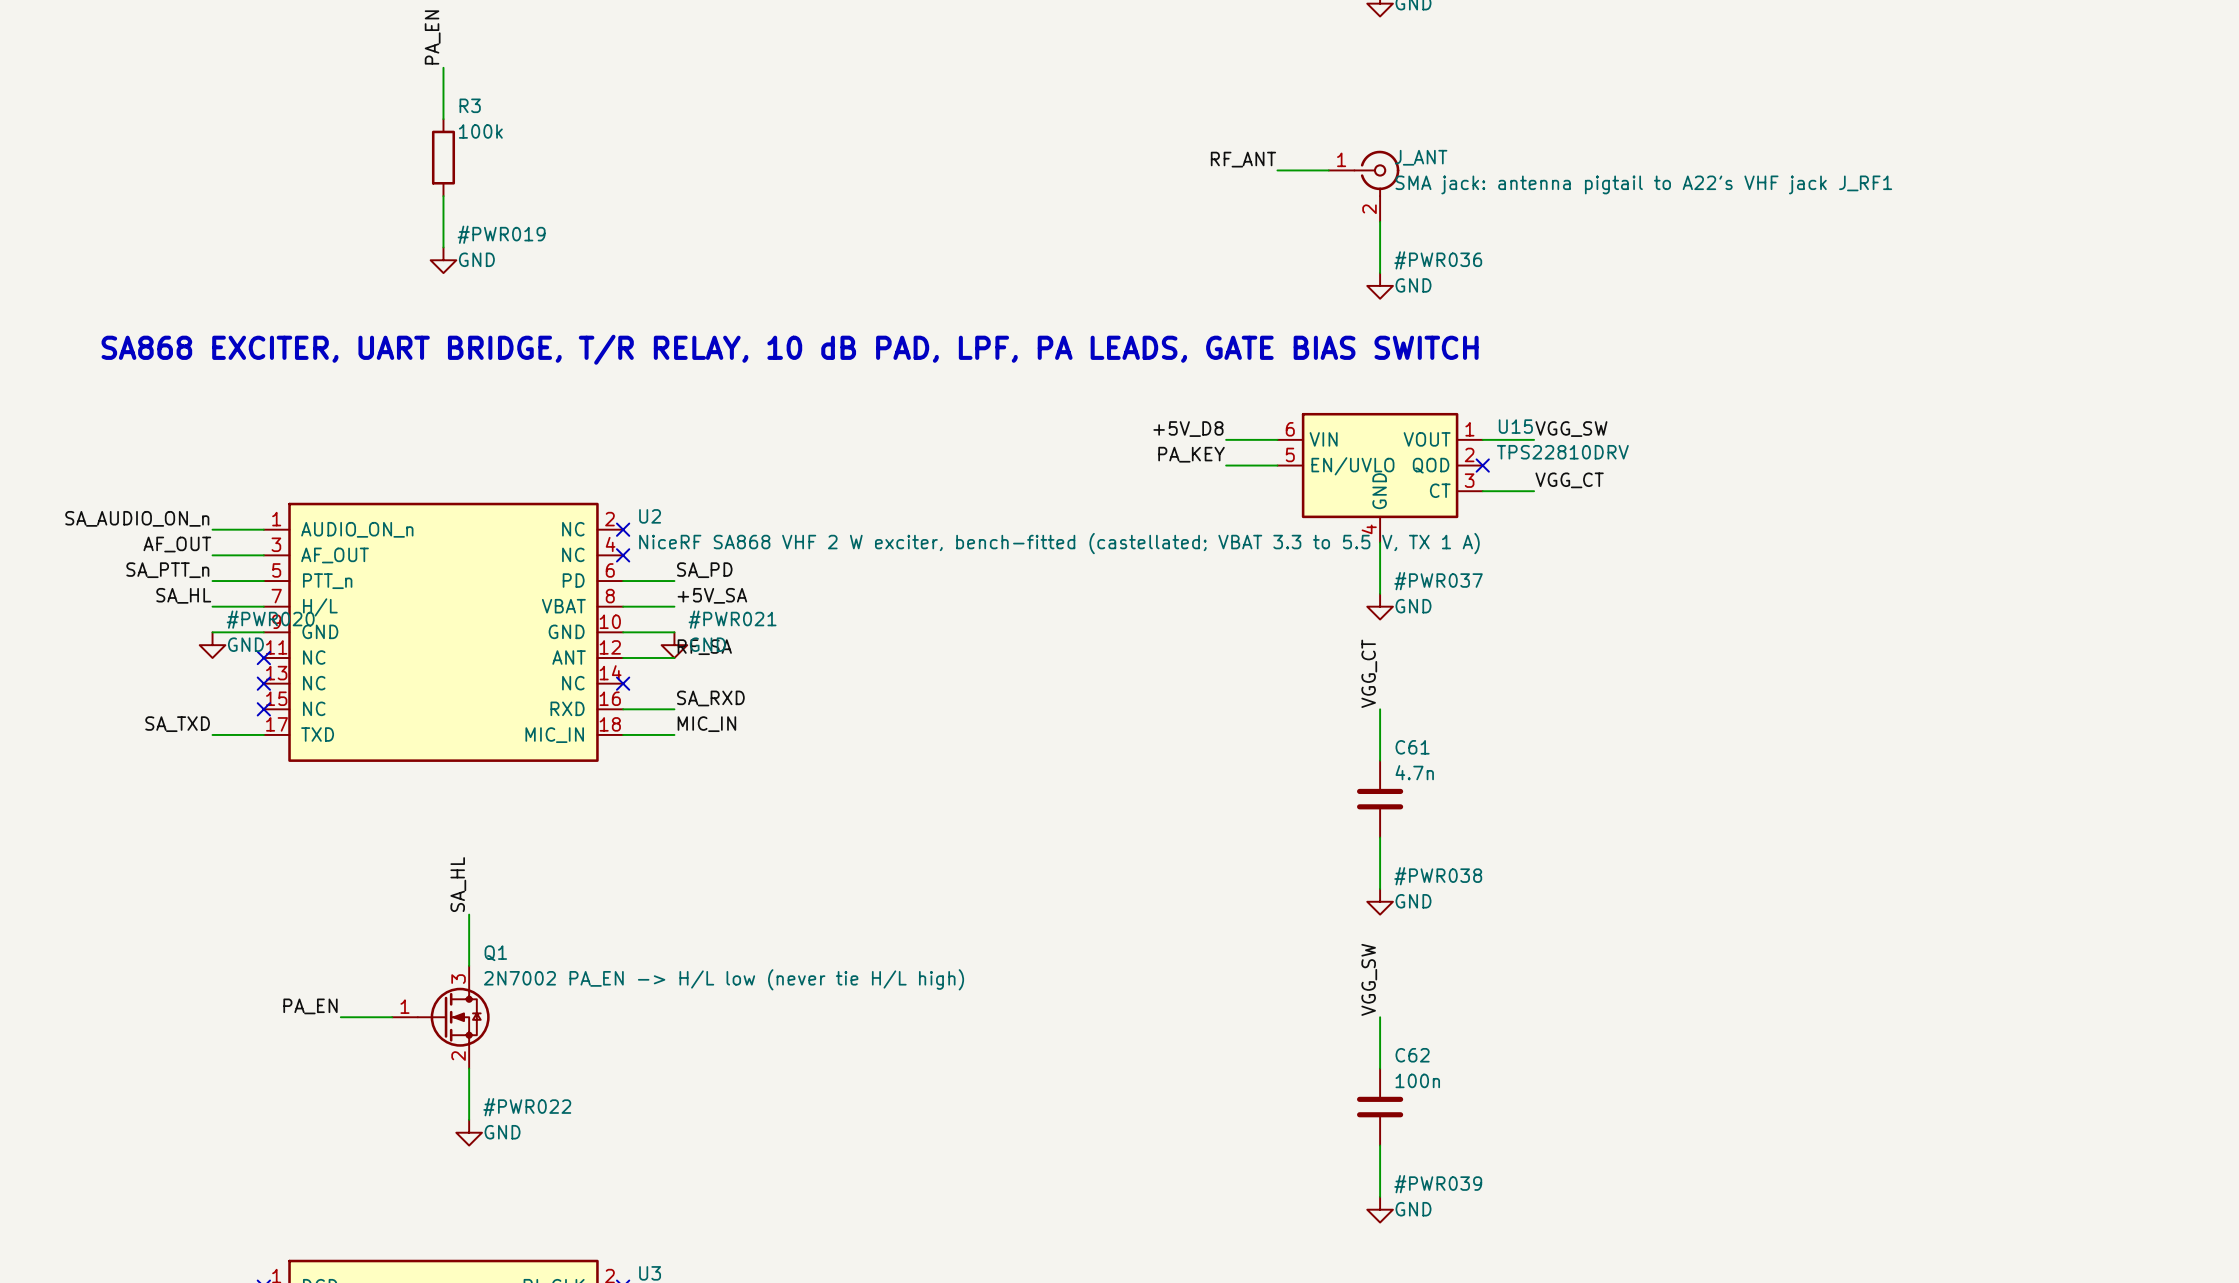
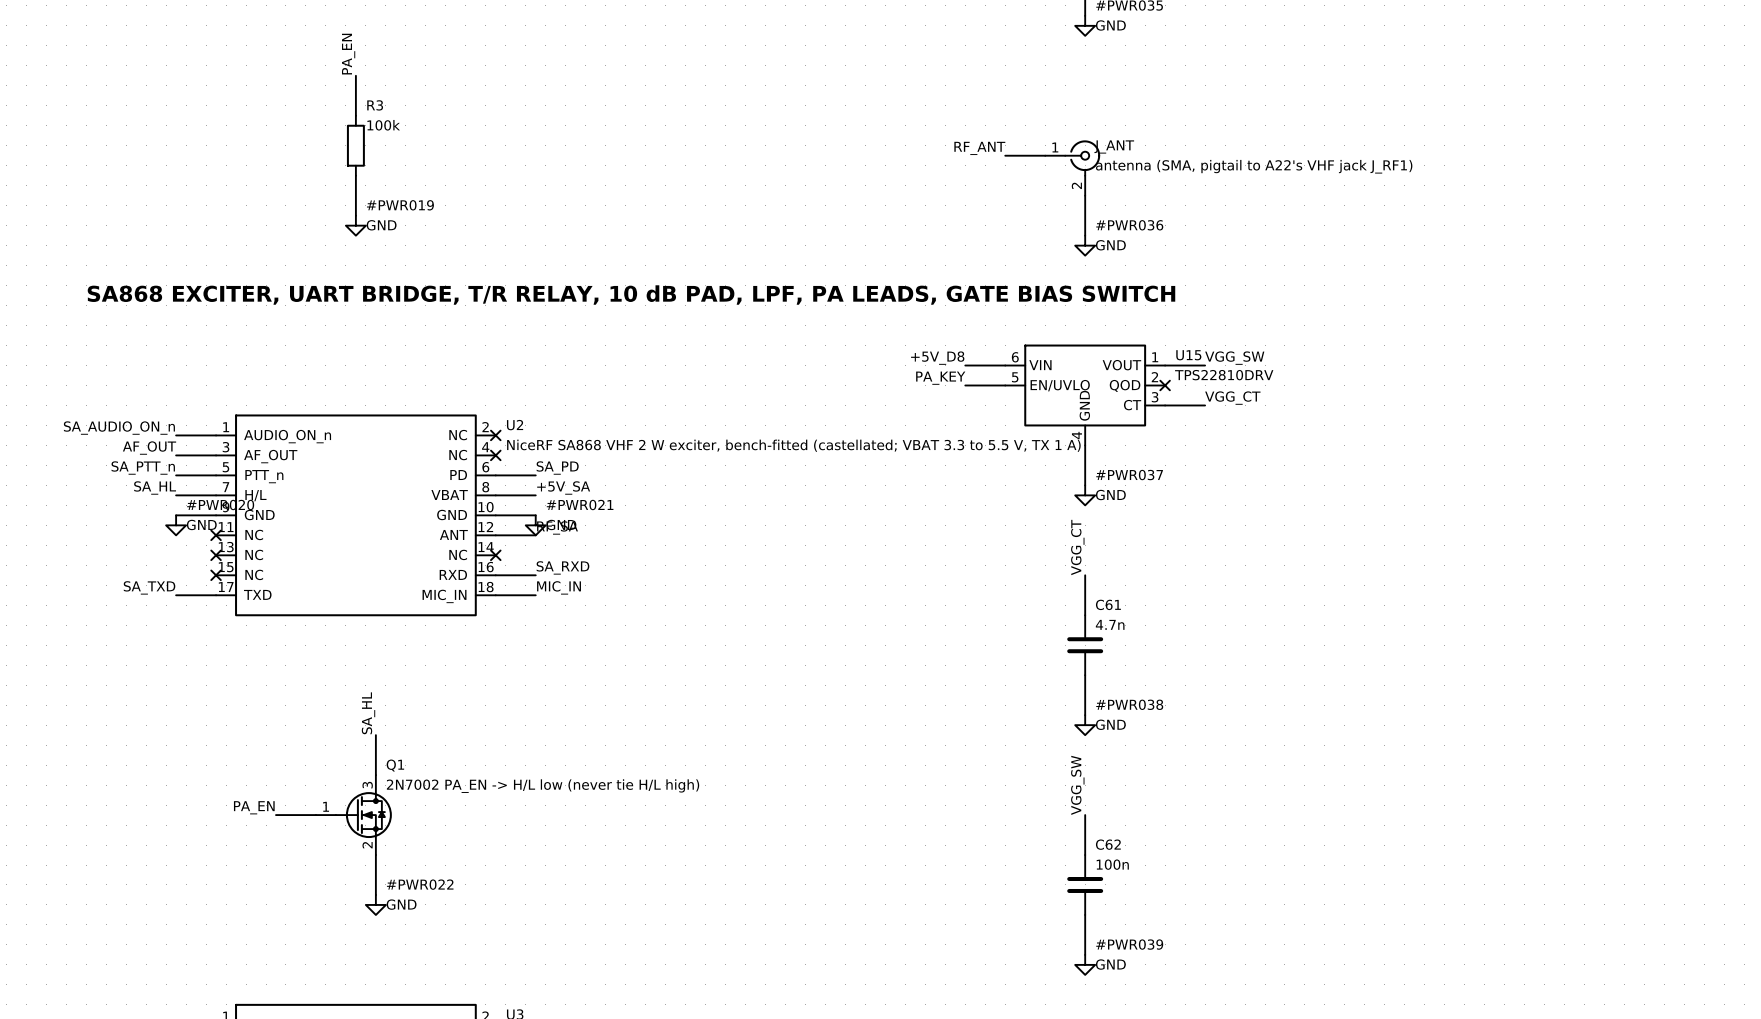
J_ANT value: SMA jack: antenna pigtail to A22's VHF jack J_RF1 (1643, 184) -> antenna (SMA, pigtail to A22's VHF jack J_RF1) (1254, 166)

